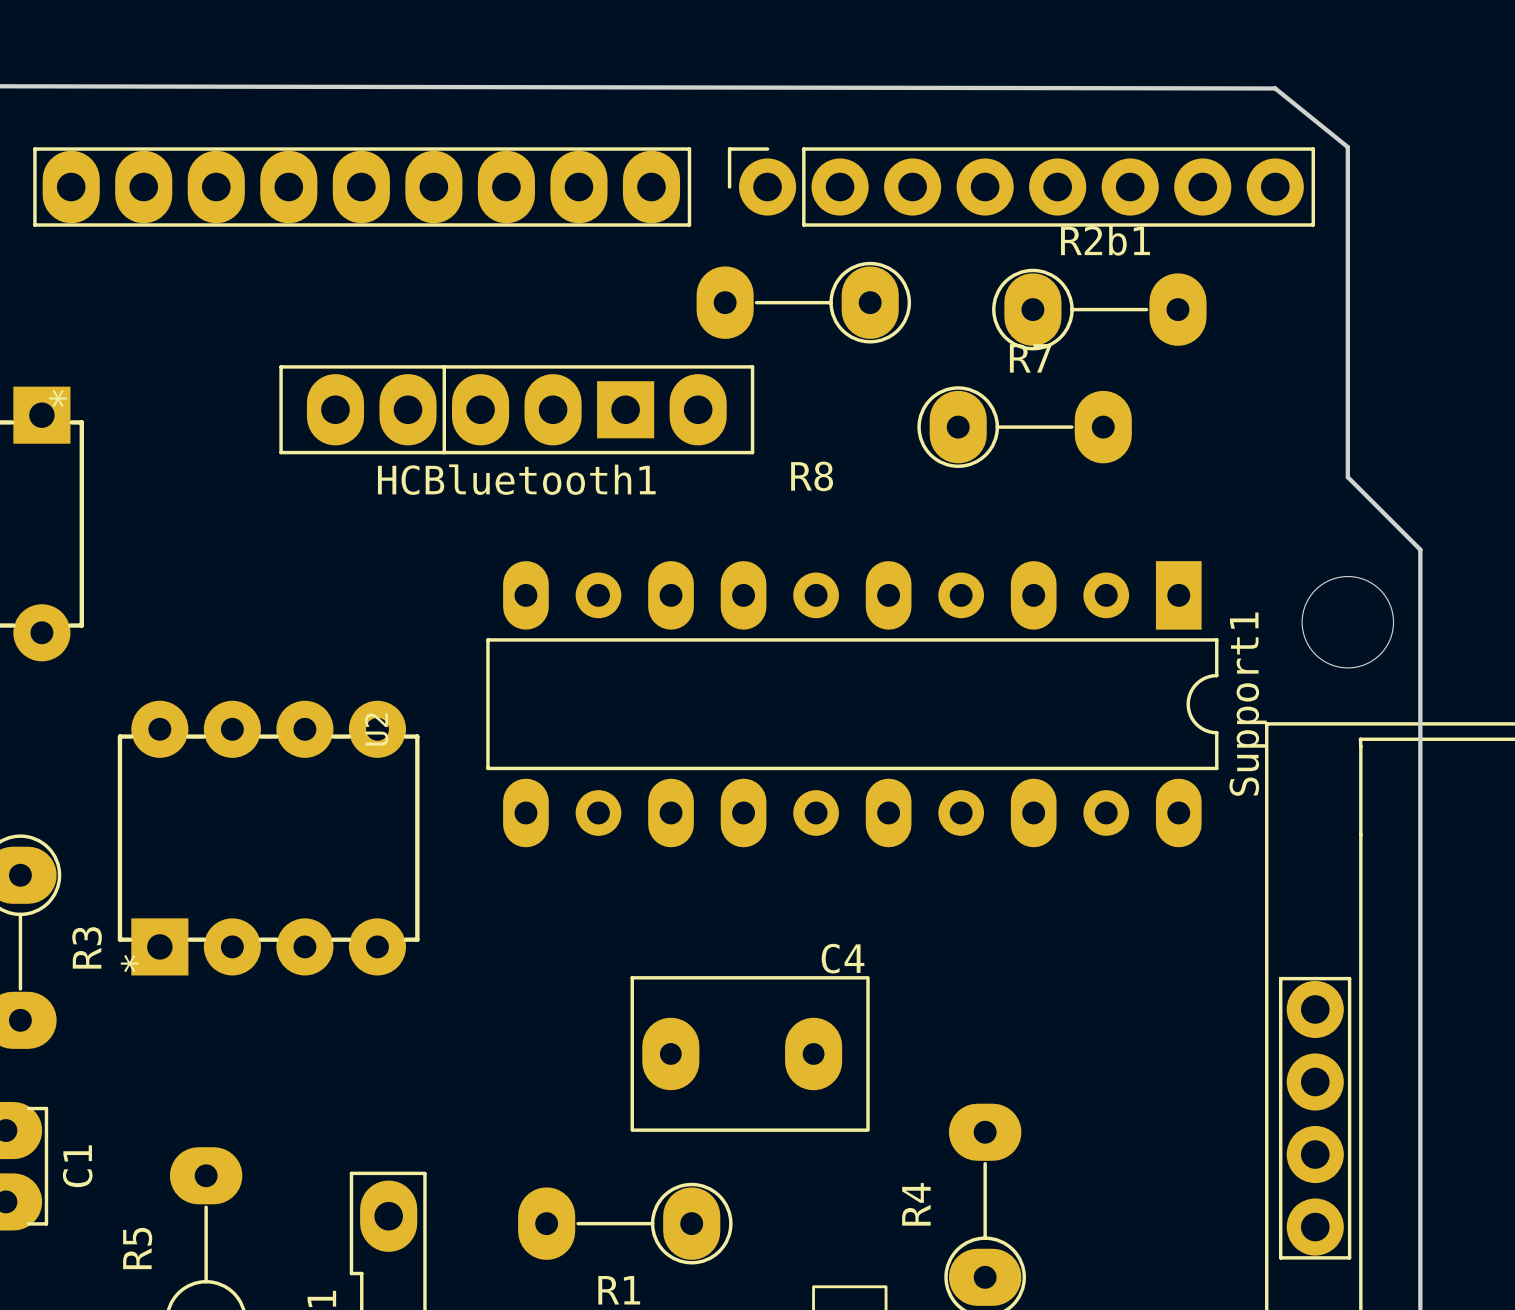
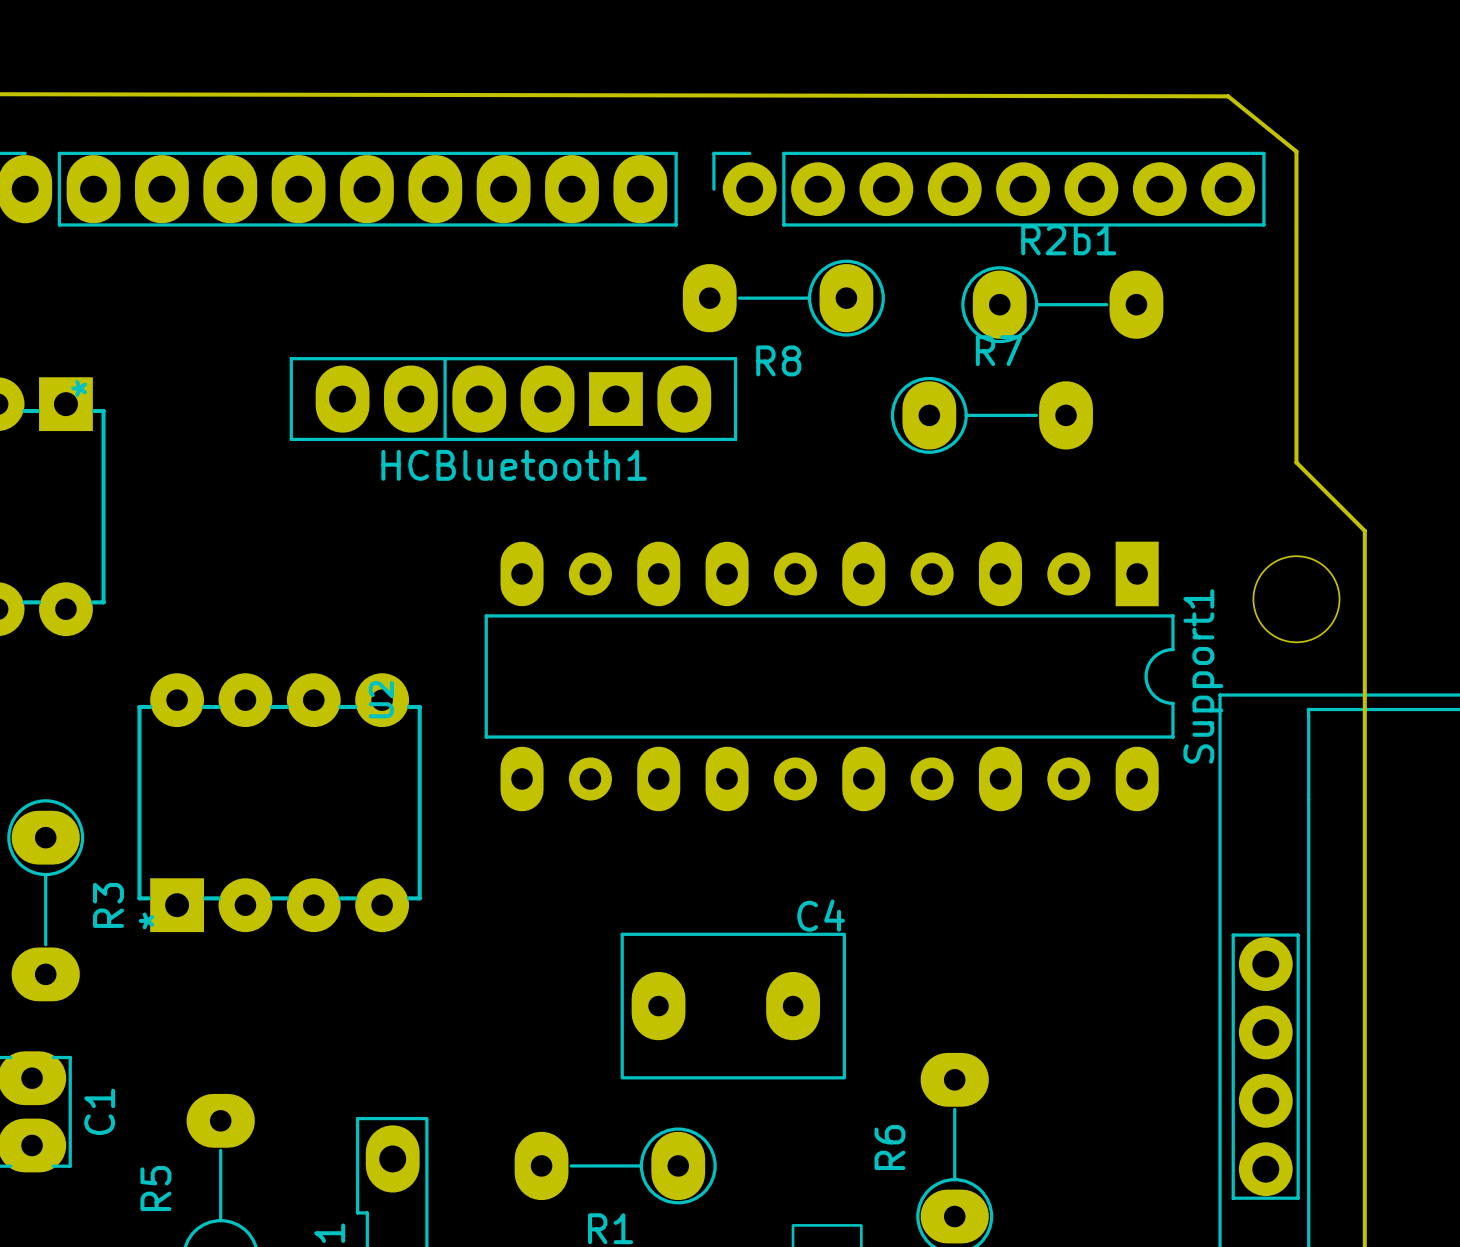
R8 name position: R8 (812, 476) -> R8 (778, 360)
R4 name: R4 (916, 1204) -> R6 (889, 1147)

